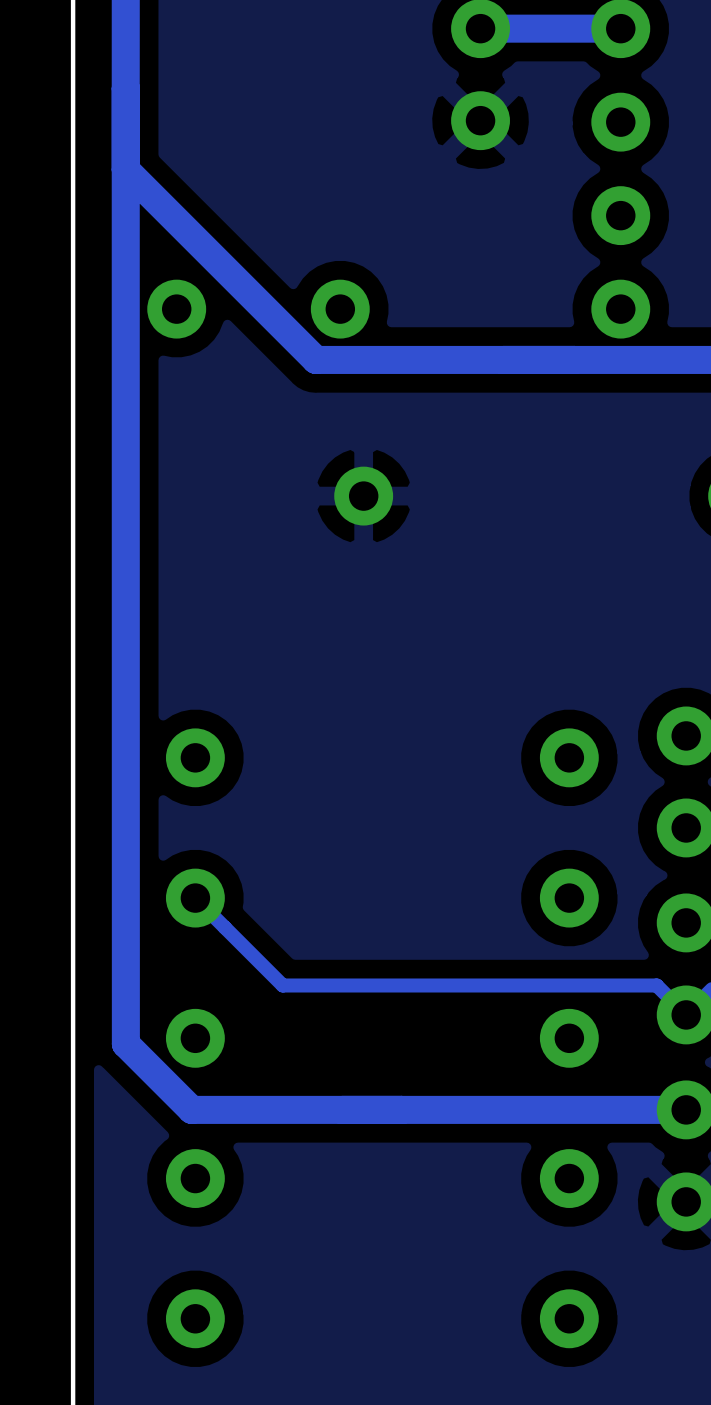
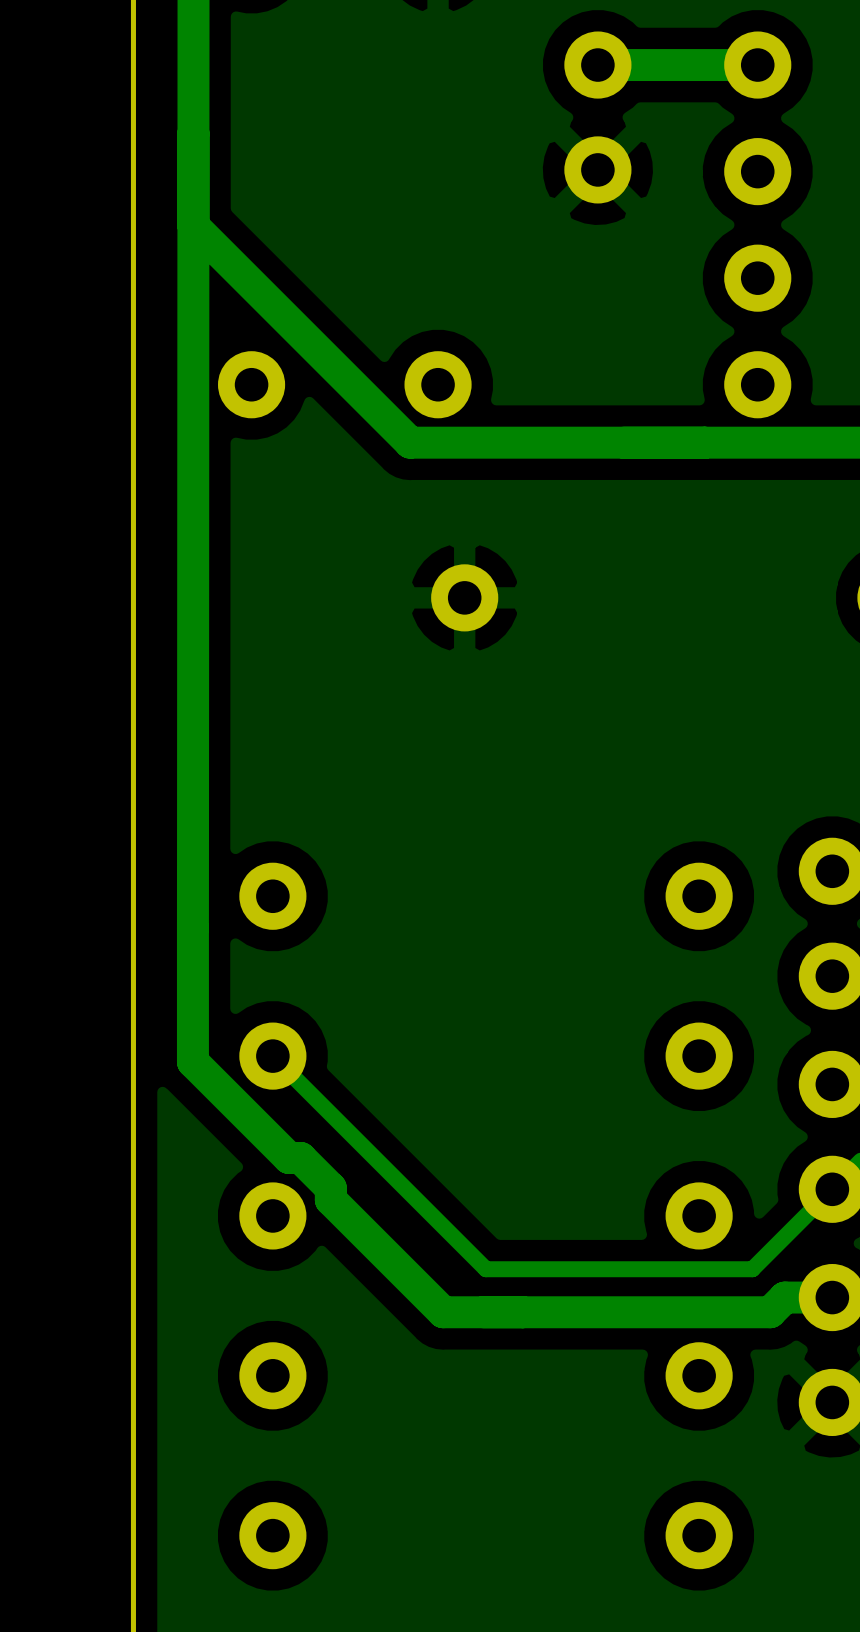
track: (125, 88) (125, 1044) (191, 1109) (644, 1109) -> (193, 133) (192, 1061) (289, 1158) (300, 1158) (330, 1188) (330, 1199) (443, 1312) (770, 1312) (784, 1297)
track: (282, 985) (656, 985) (686, 1014) -> (372, 1155) (486, 1269) (752, 1269) (832, 1189)

